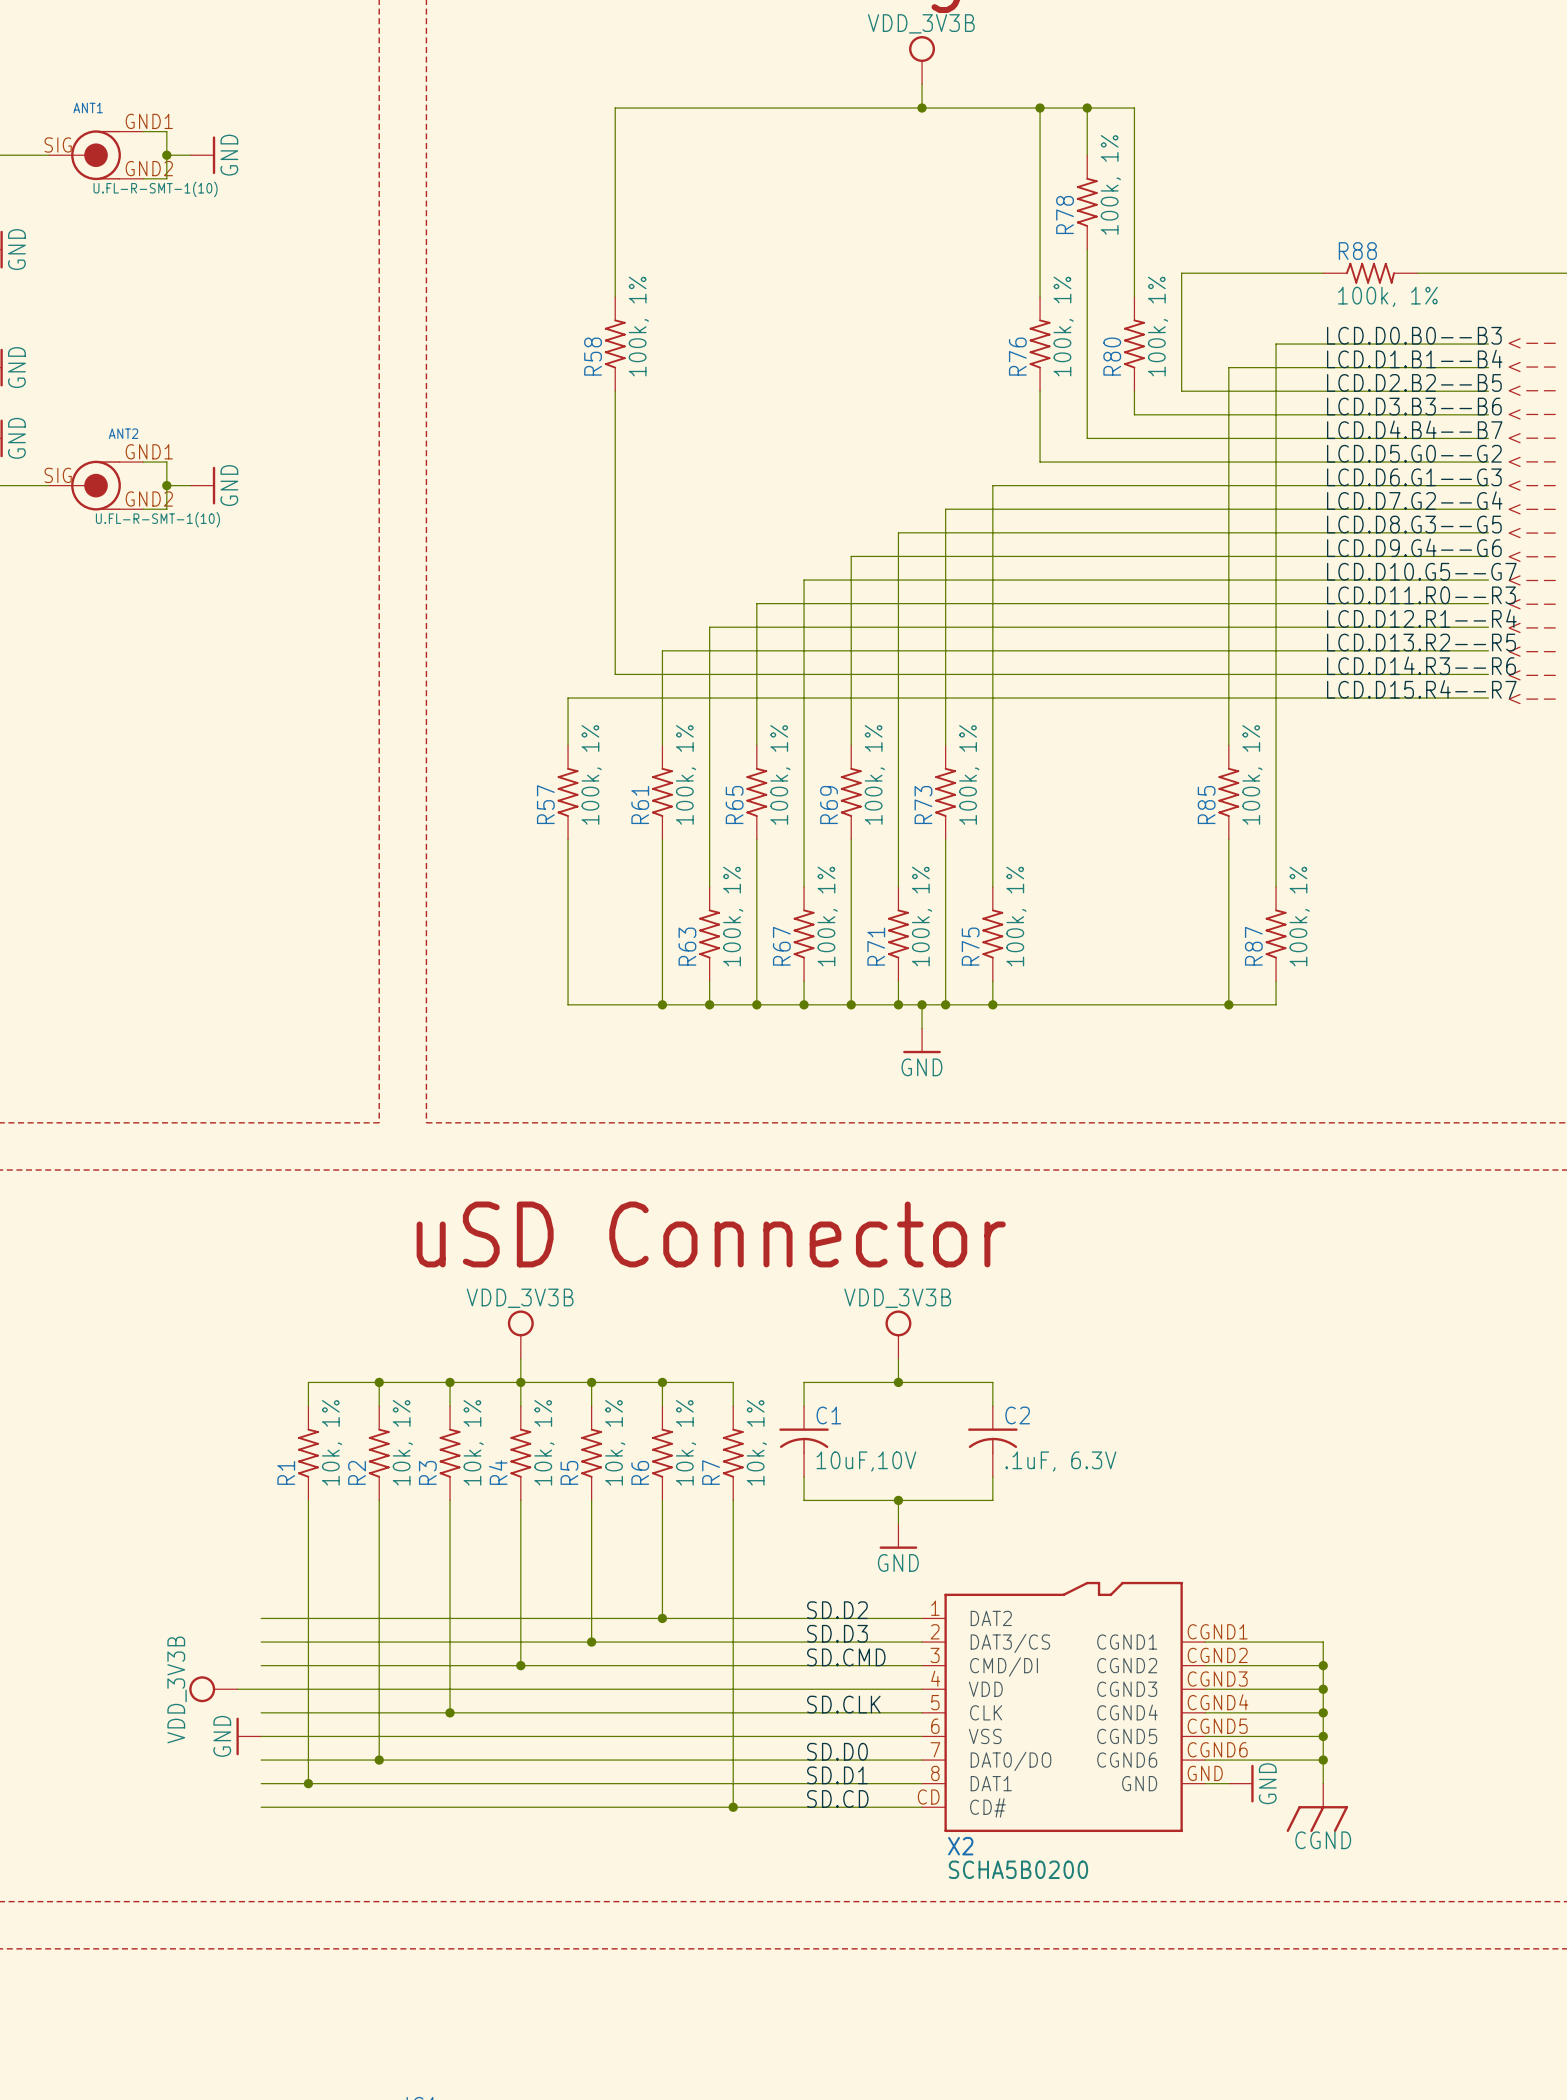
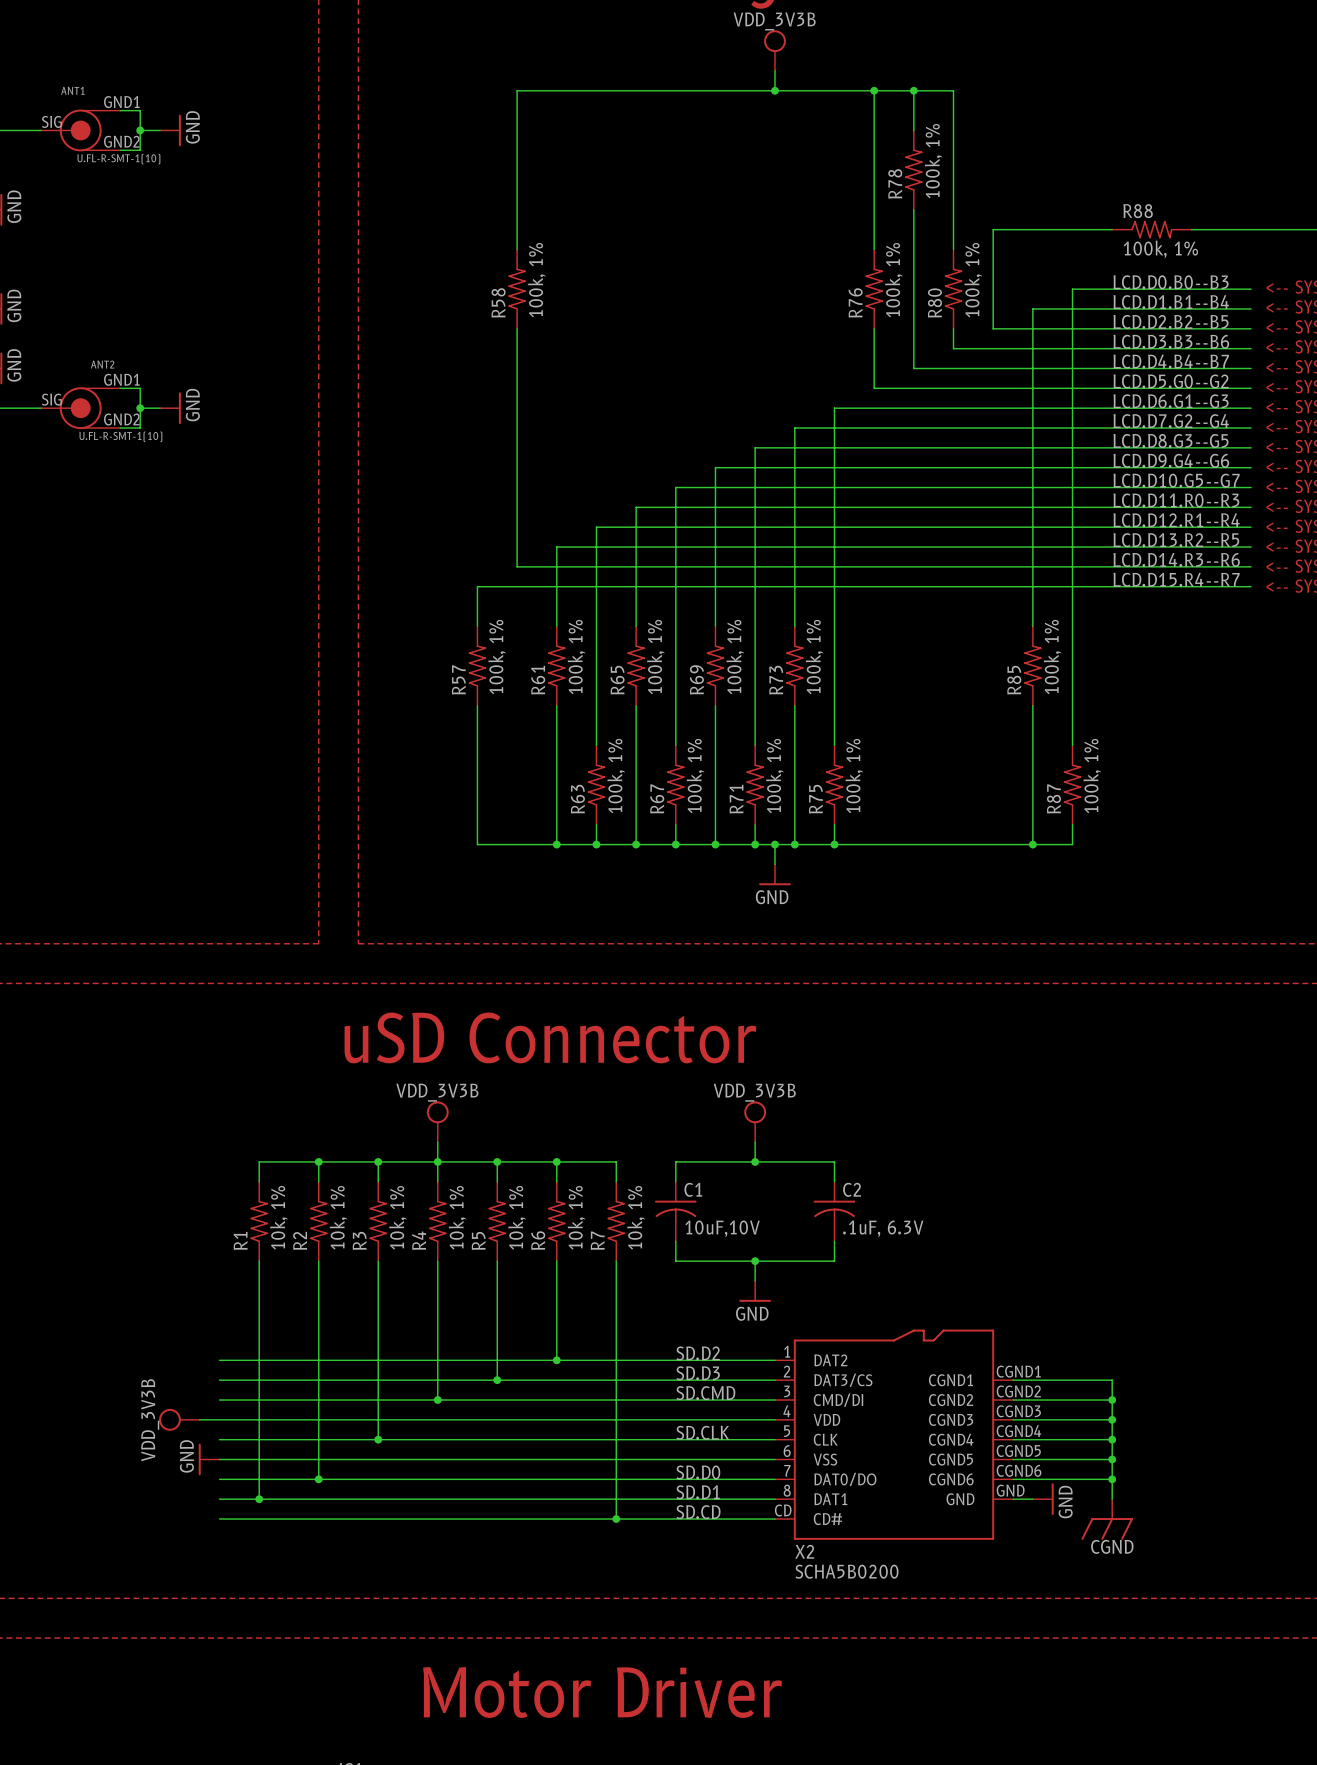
text: none -> Motor Driver (602, 1692)

